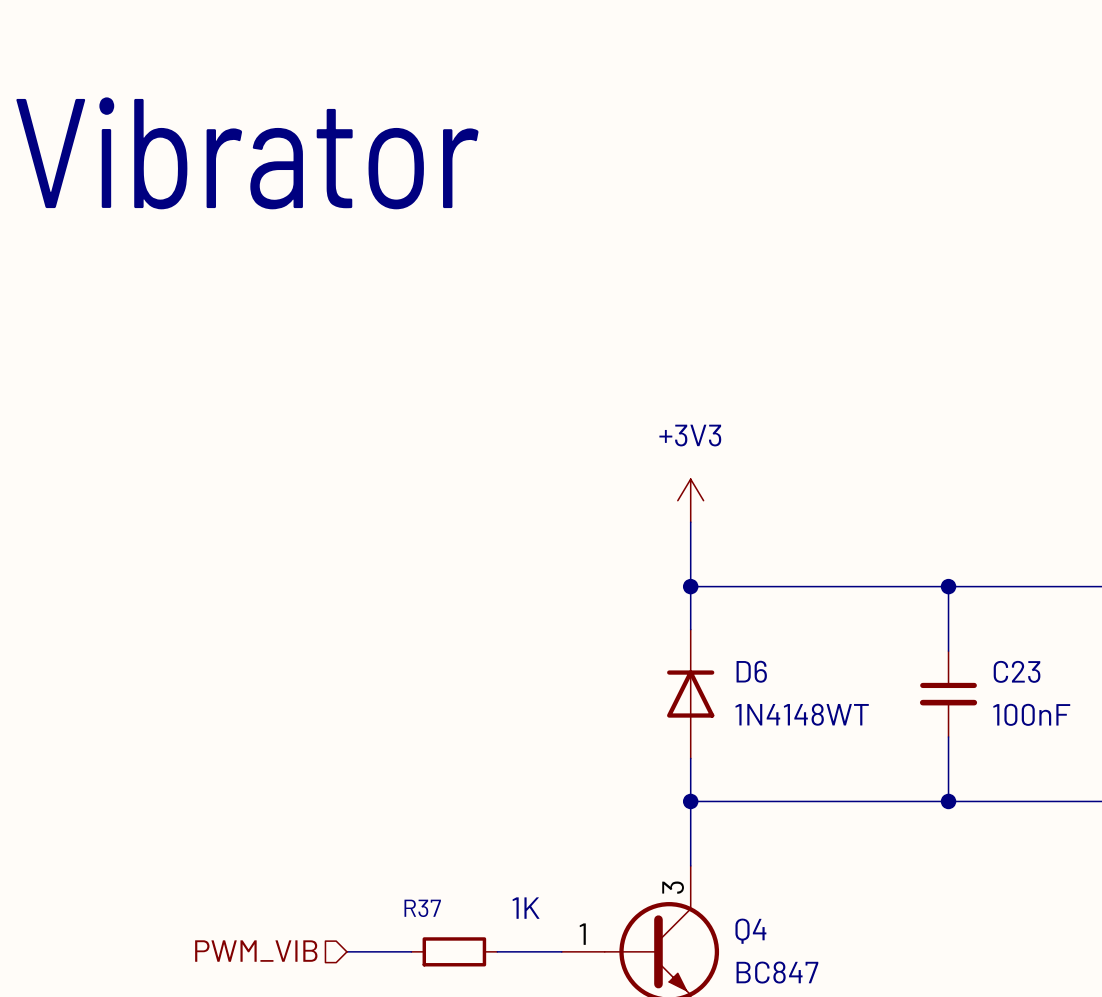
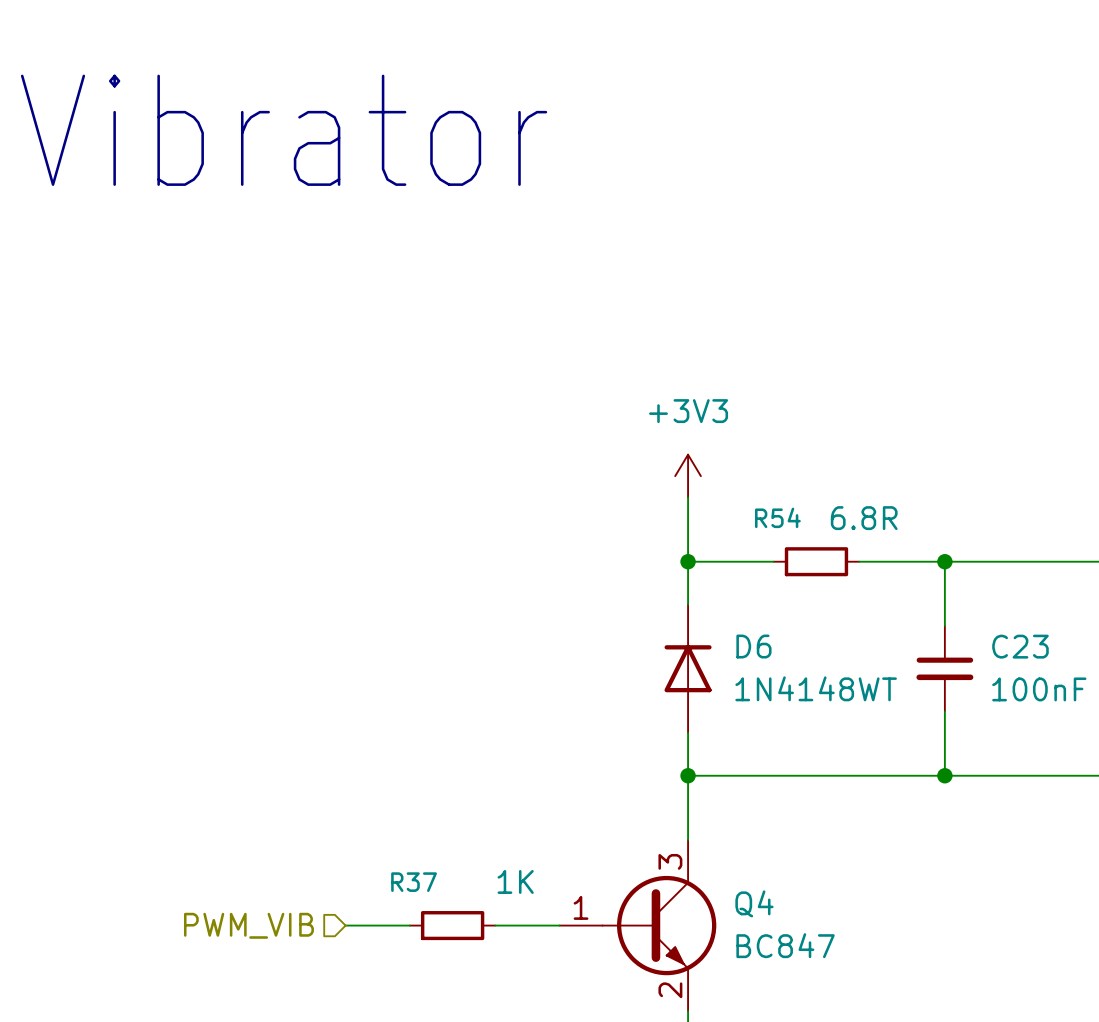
wire: (776, 586) (862, 586) -> none
R54: none -> 6.8R (816, 561)

